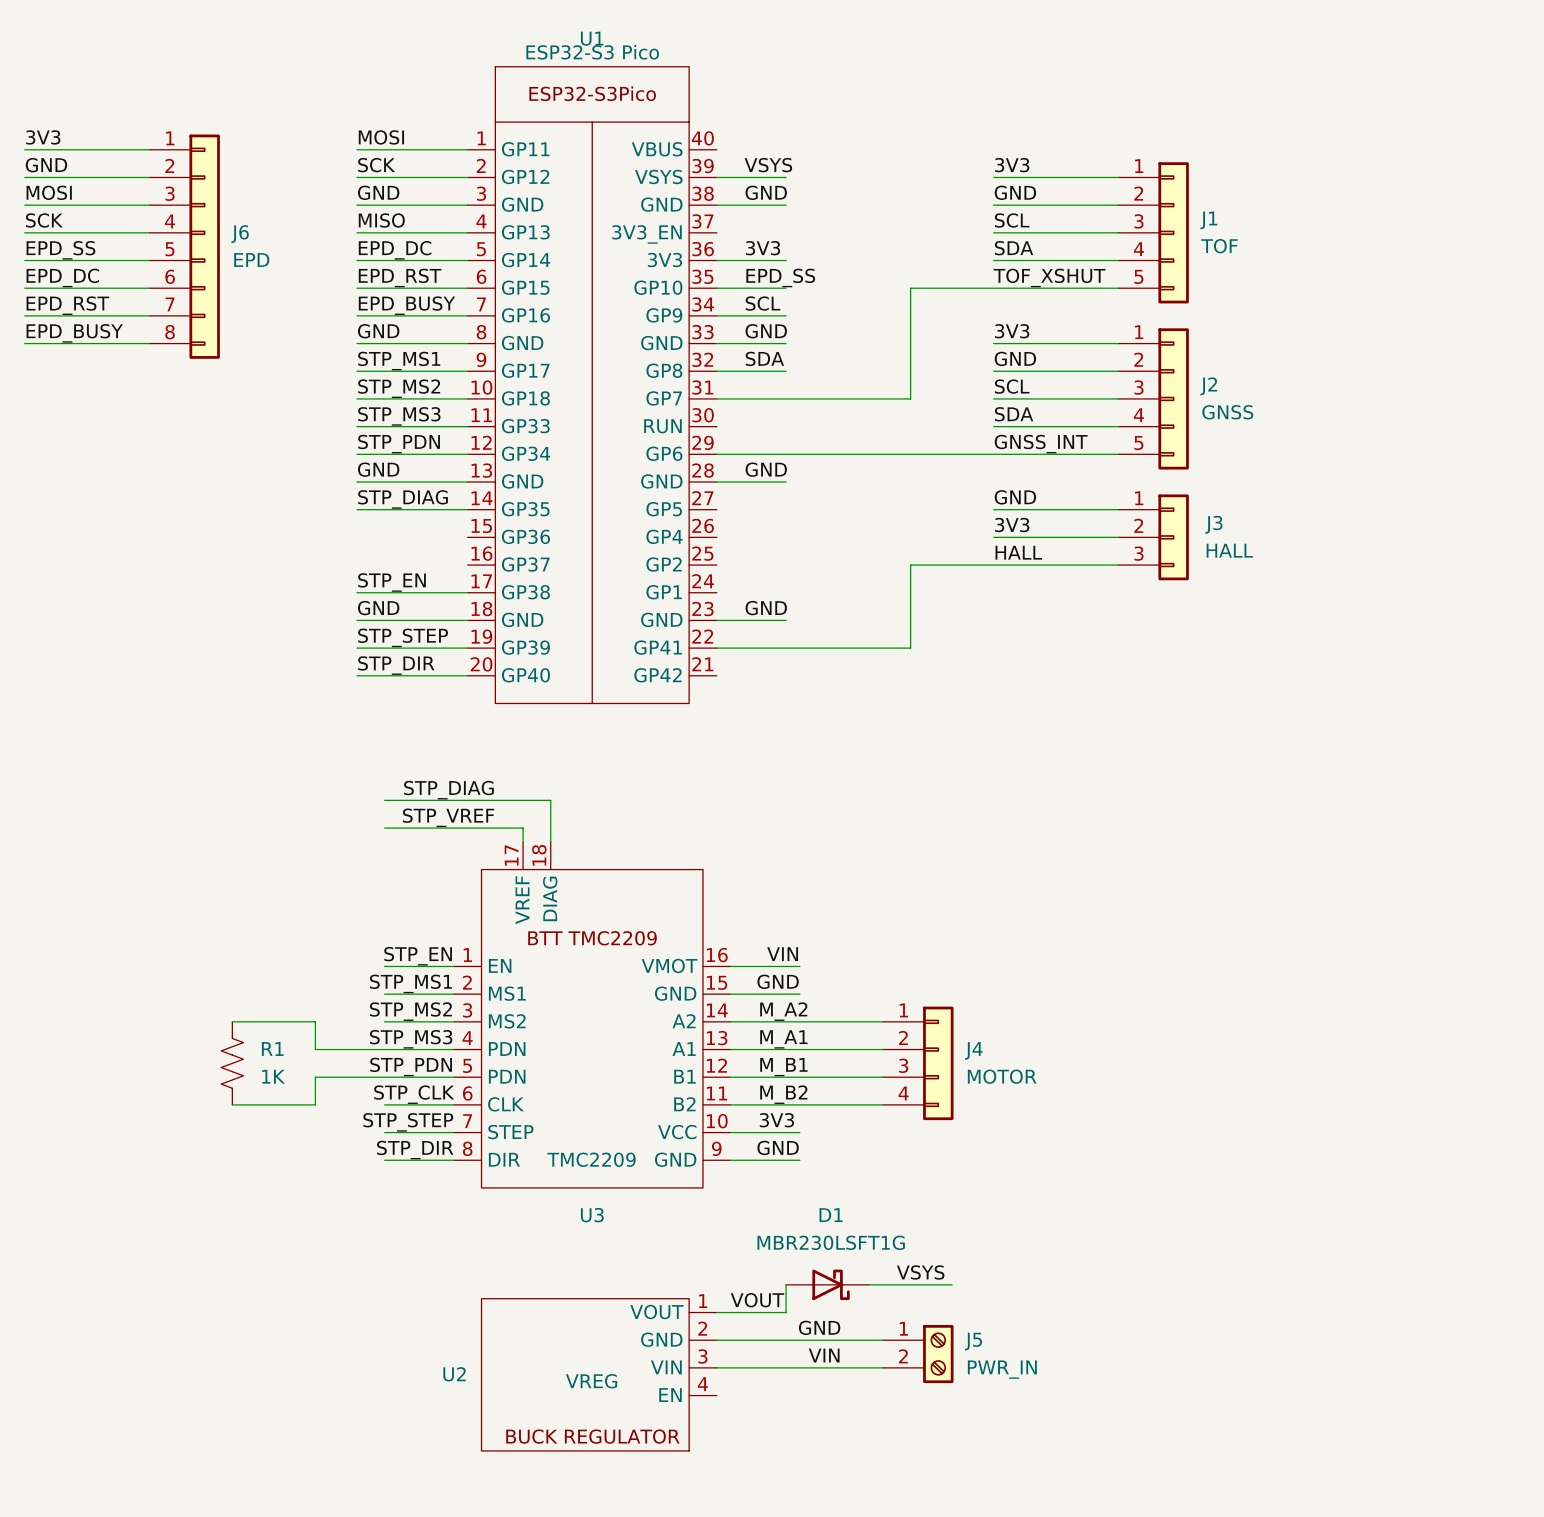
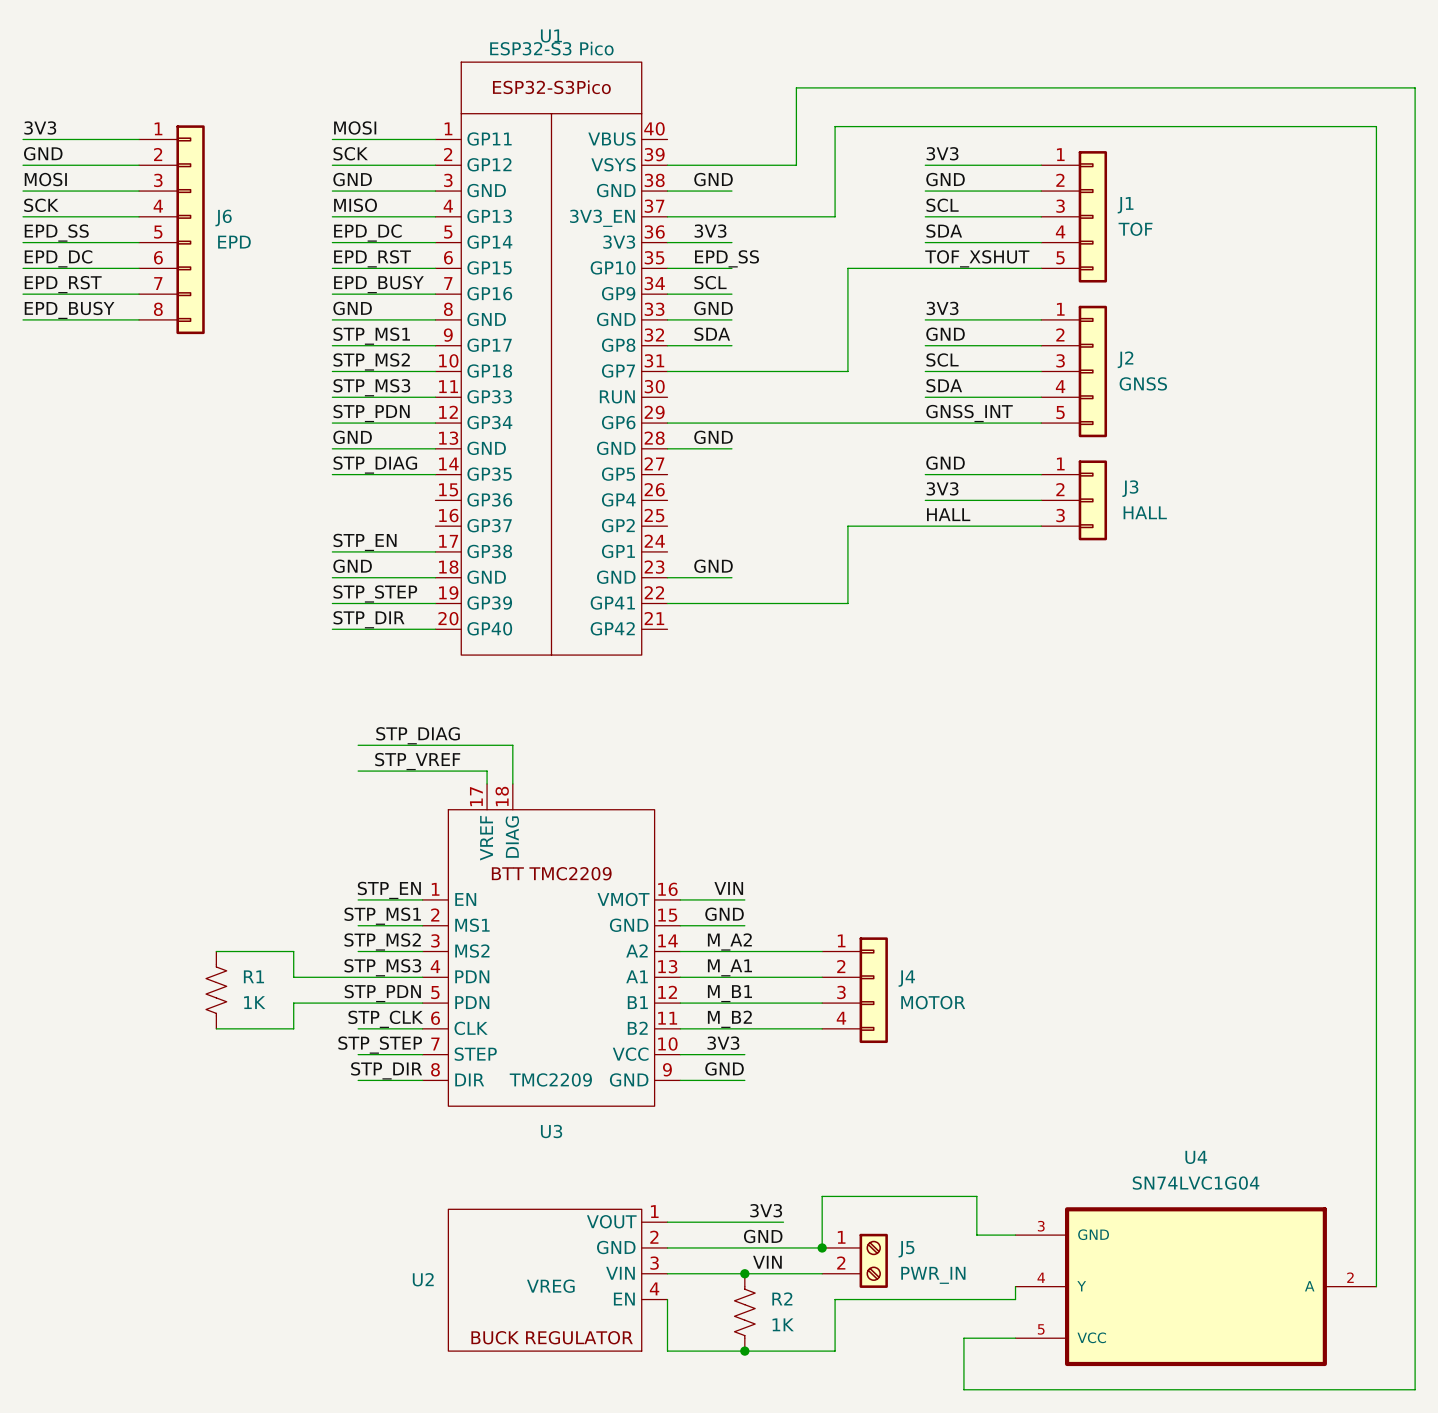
label: VSYS (768, 165) -> none
wire: none -> (731, 165) (796, 165) (796, 87) (1415, 87) (1415, 1389) (963, 1389) (963, 1338) (1015, 1338)
wire: none -> (667, 216) (835, 216) (835, 126) (1376, 126) (1376, 1286)
label: VSYS (920, 1272) -> none
wire: (786, 1284) (786, 1312) -> (783, 1222) (731, 1222)
D1: MBR230LSFT1G (827, 1284) -> none
wire: (869, 1284) (882, 1284) -> (822, 1247) (822, 1196)
wire: none -> (886, 1196) (976, 1196) (976, 1235) (1015, 1235)
label: VOUT (757, 1300) -> none
label: none -> 3V3 (766, 1210)
junction: none -> (822, 1247)
junction: none -> (744, 1273)
wire: none -> (1015, 1286) (1015, 1299) (835, 1299) (835, 1351) (667, 1351) (667, 1299)
U4: none -> SN74LVC1G04 (1195, 1286)
R2: none -> 1K (744, 1312)
junction: none -> (744, 1351)

